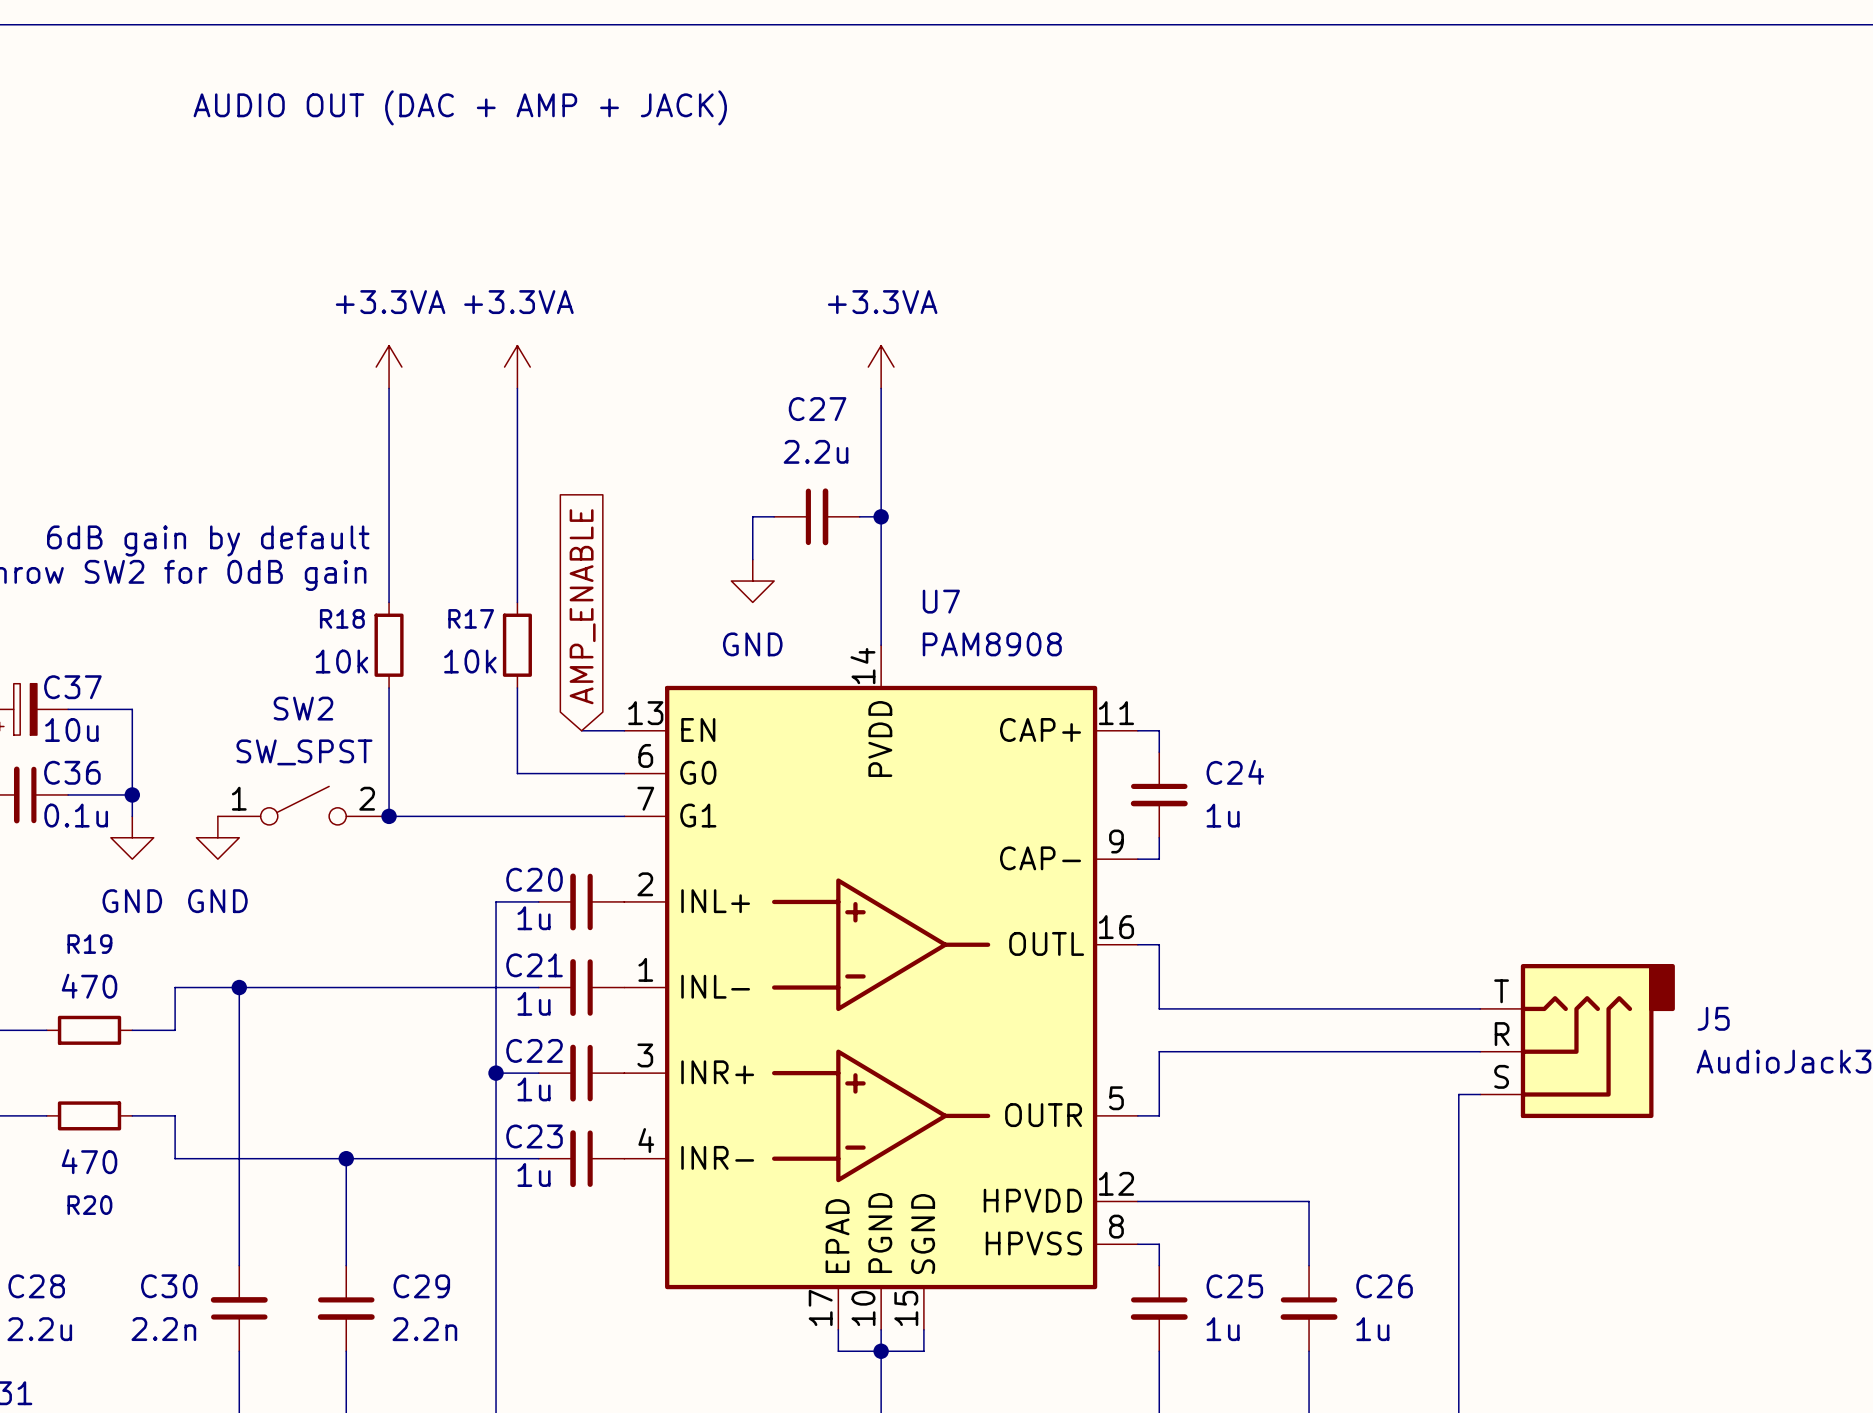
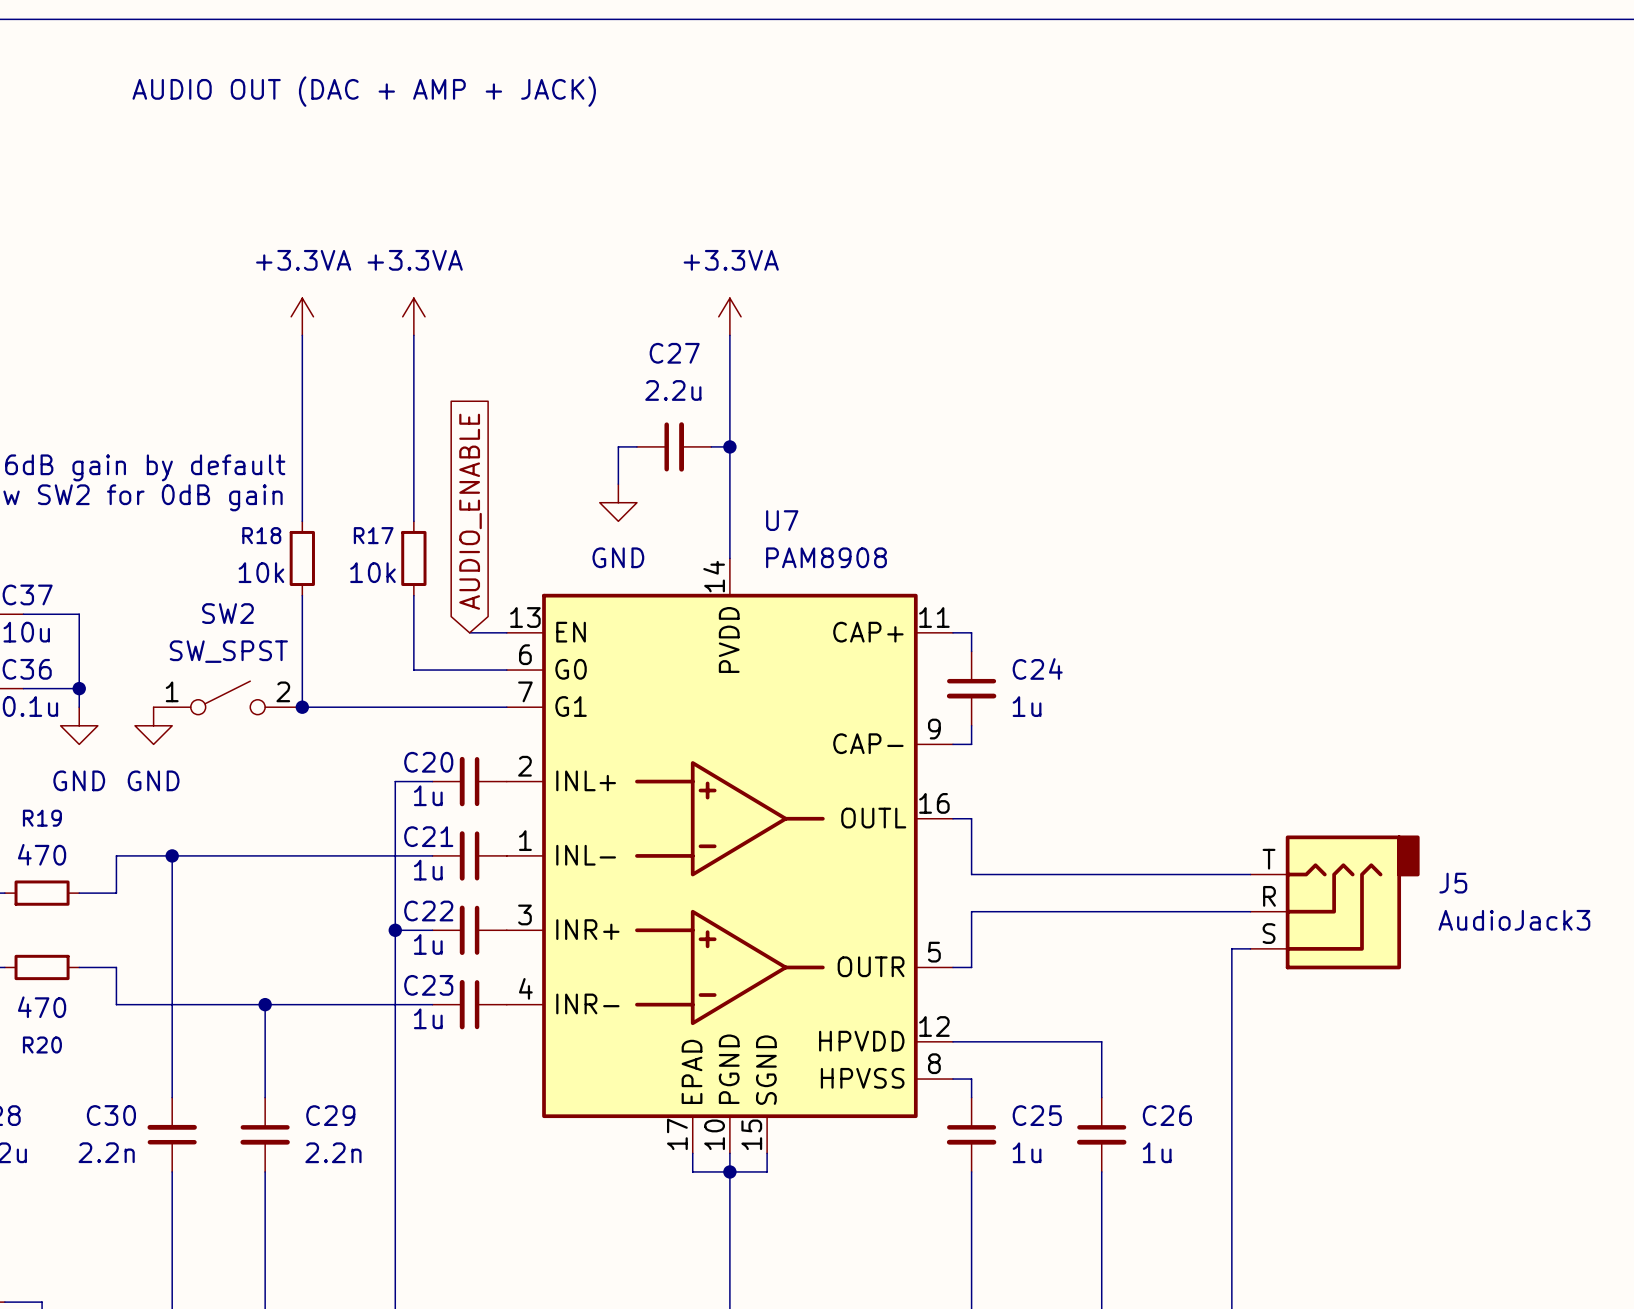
global label: AMP_ENABLE (582, 606) -> AUDIO_ENABLE (470, 511)

